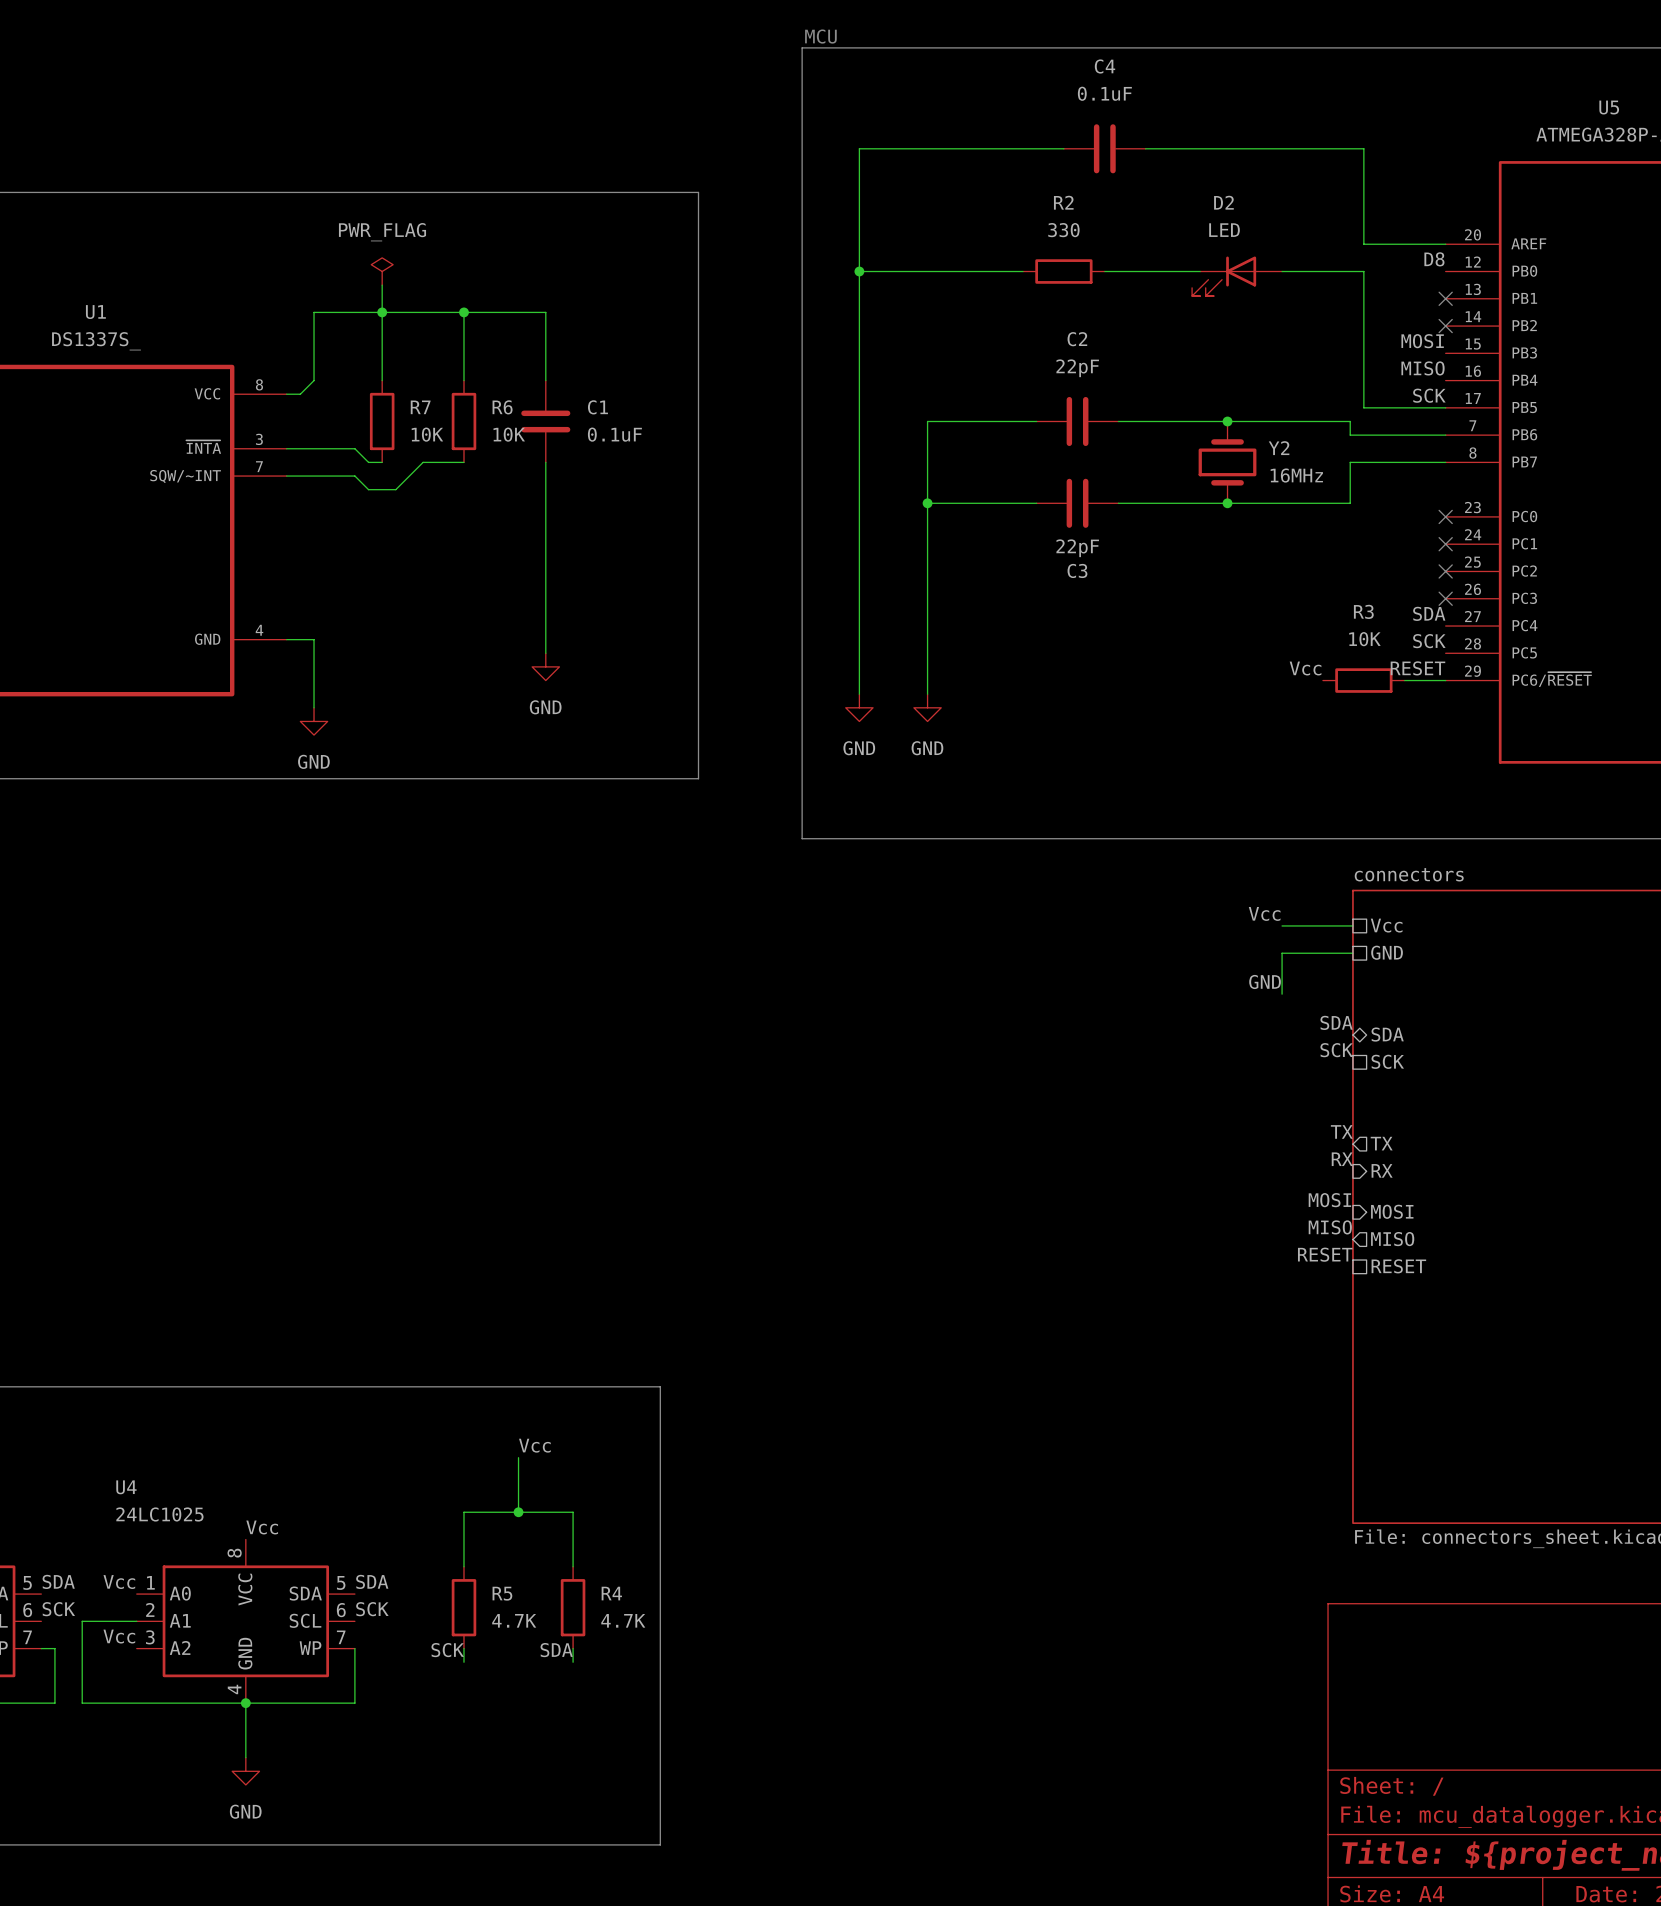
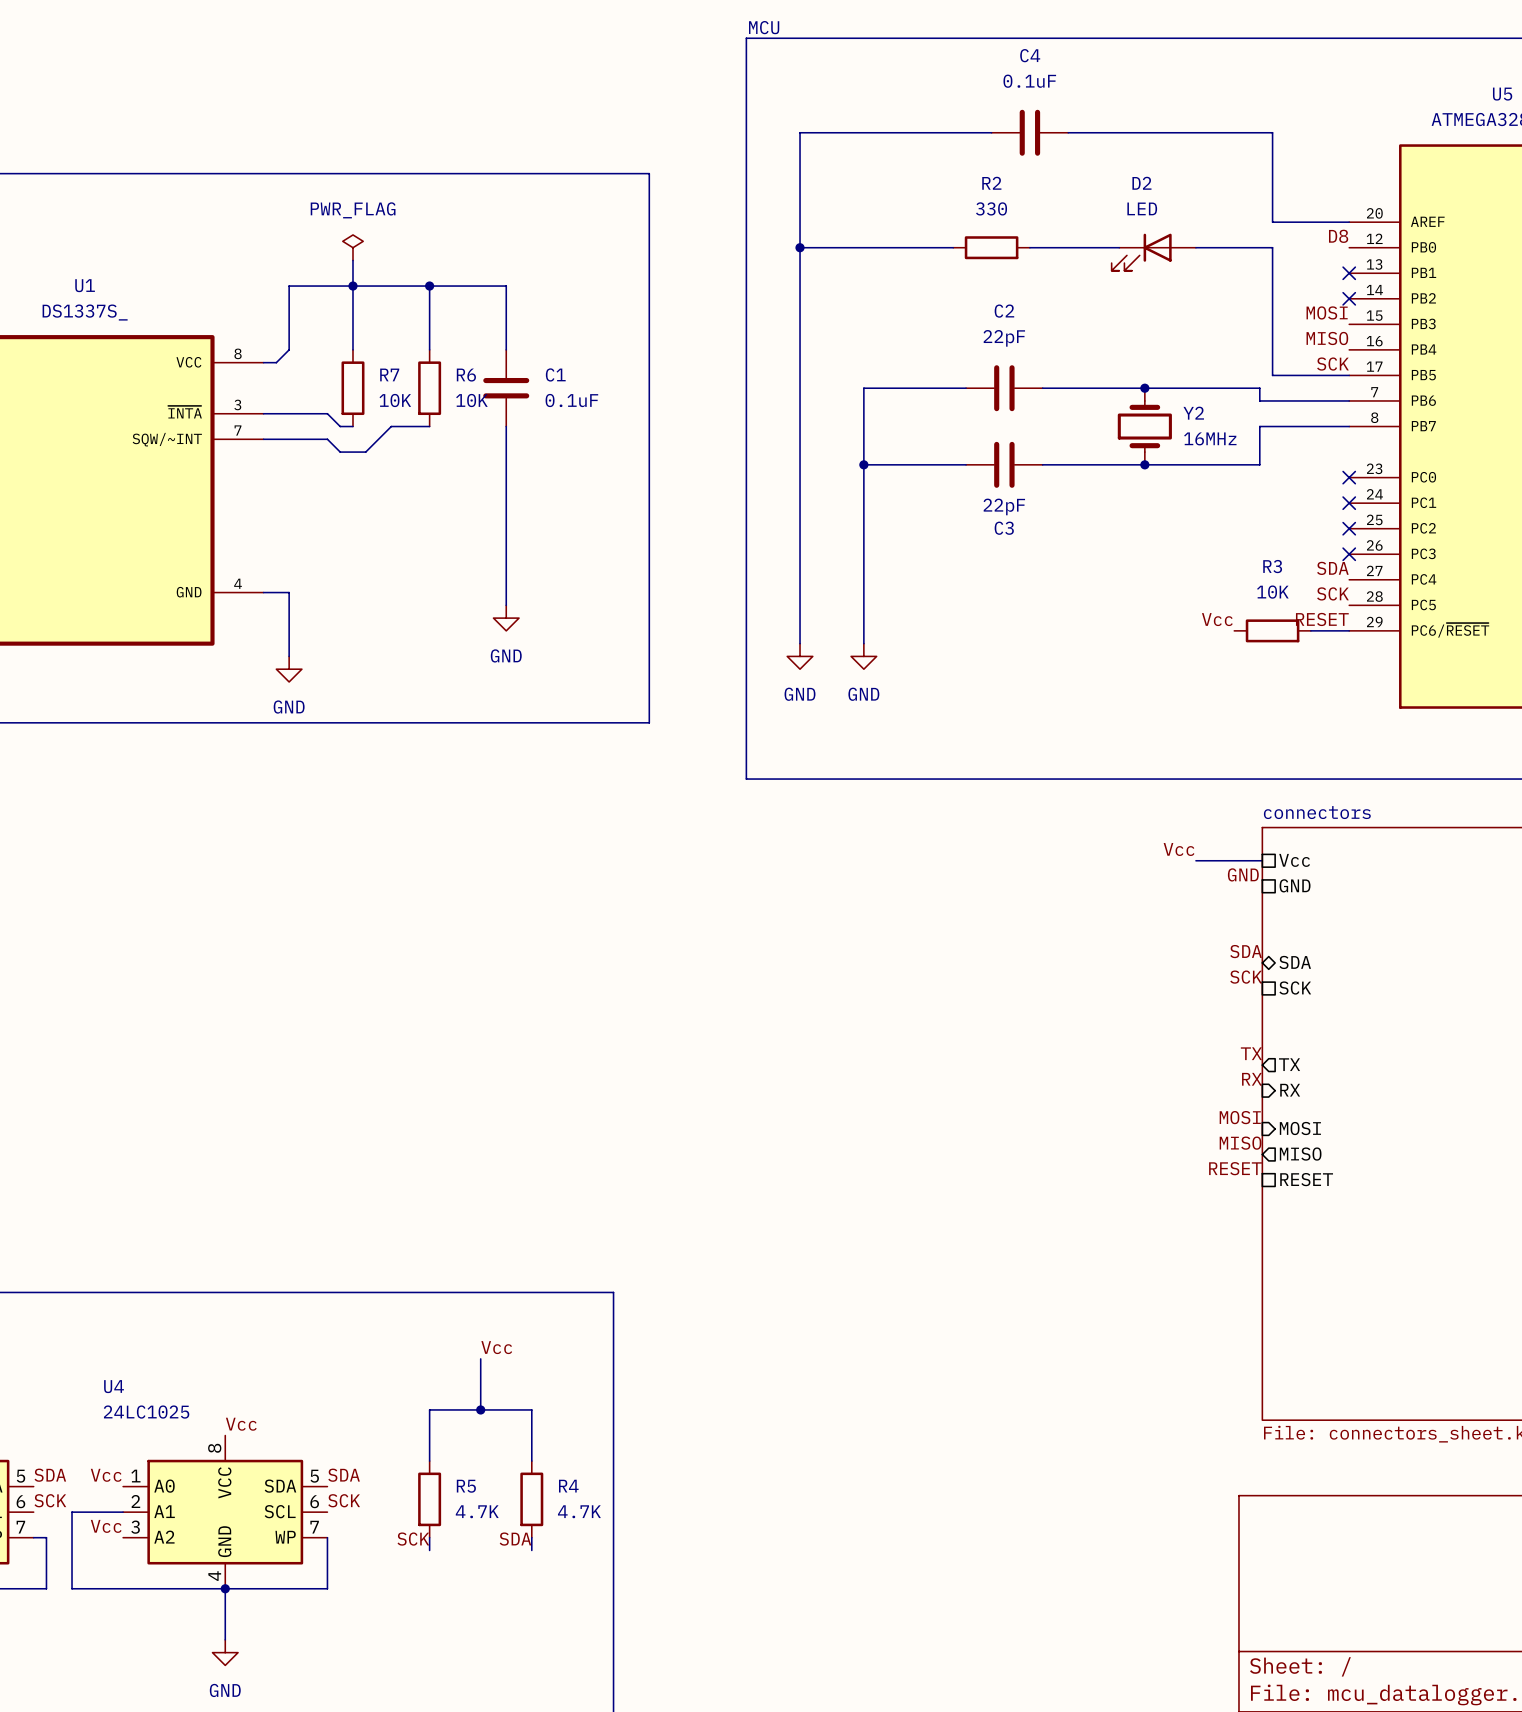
wire: (1352, 953) (1282, 953) (1282, 994) -> none
label position: GND (1265, 981) -> GND (1243, 874)

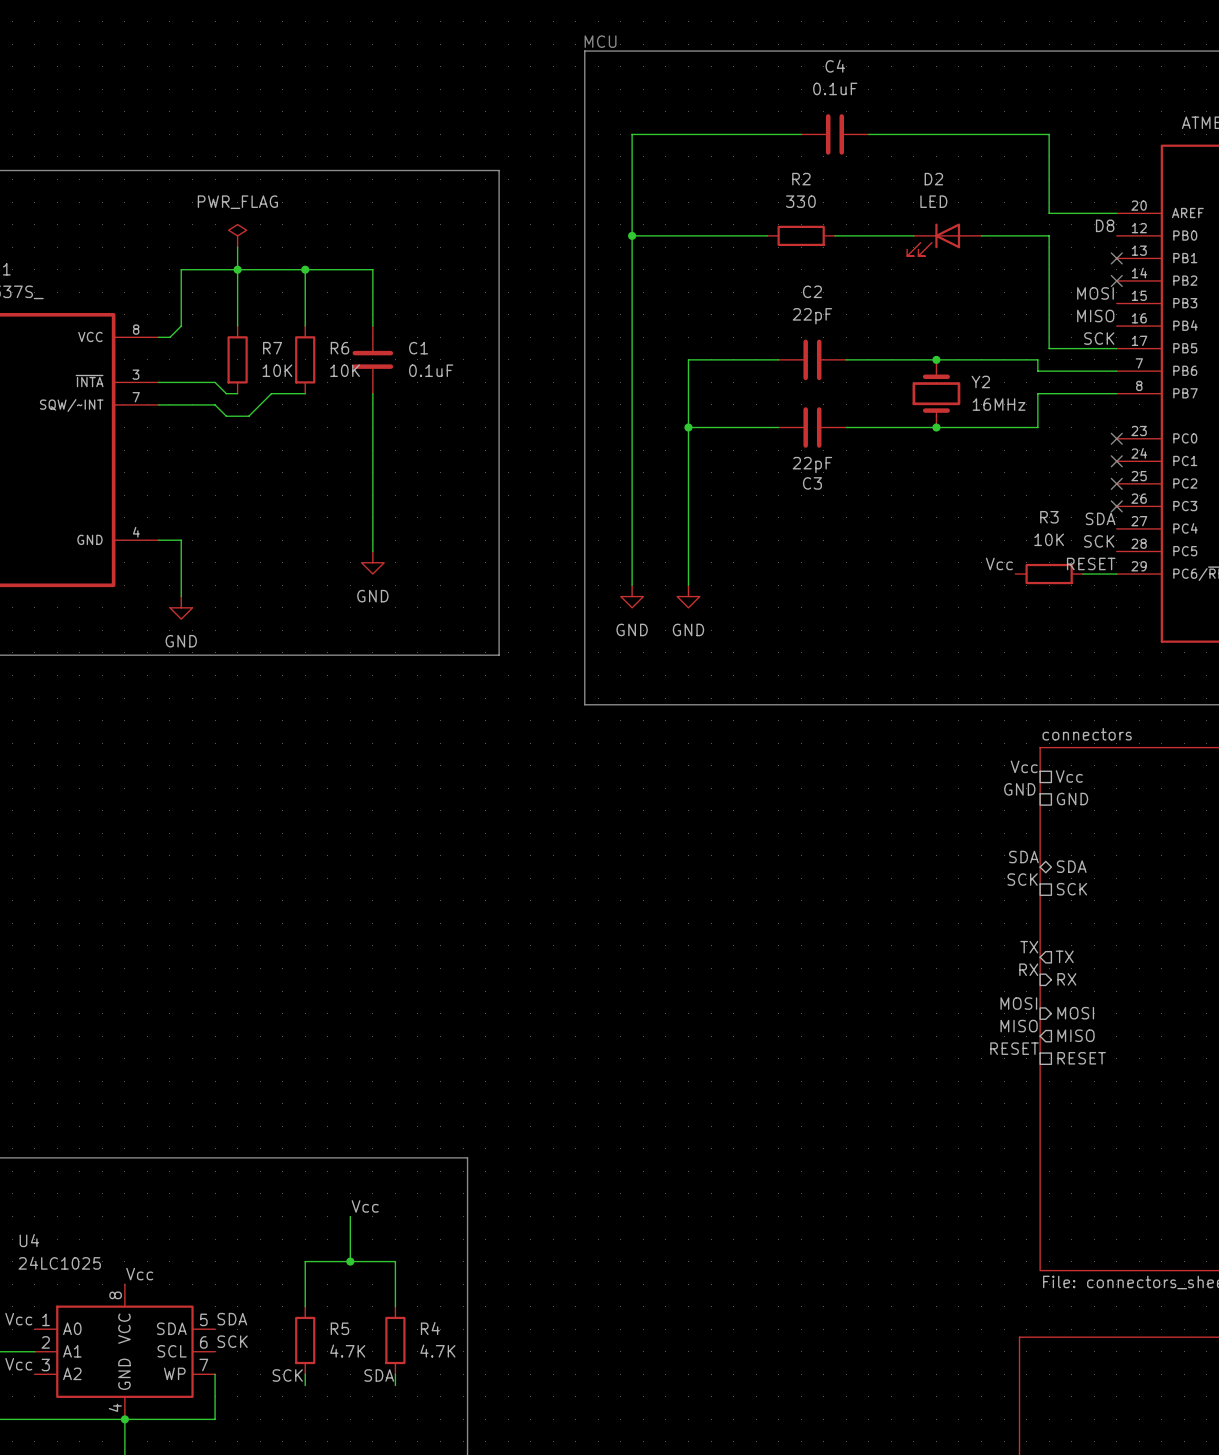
label position: Vcc (1179, 849) -> Vcc (1024, 766)
wire: (1195, 860) (1262, 860) -> none

